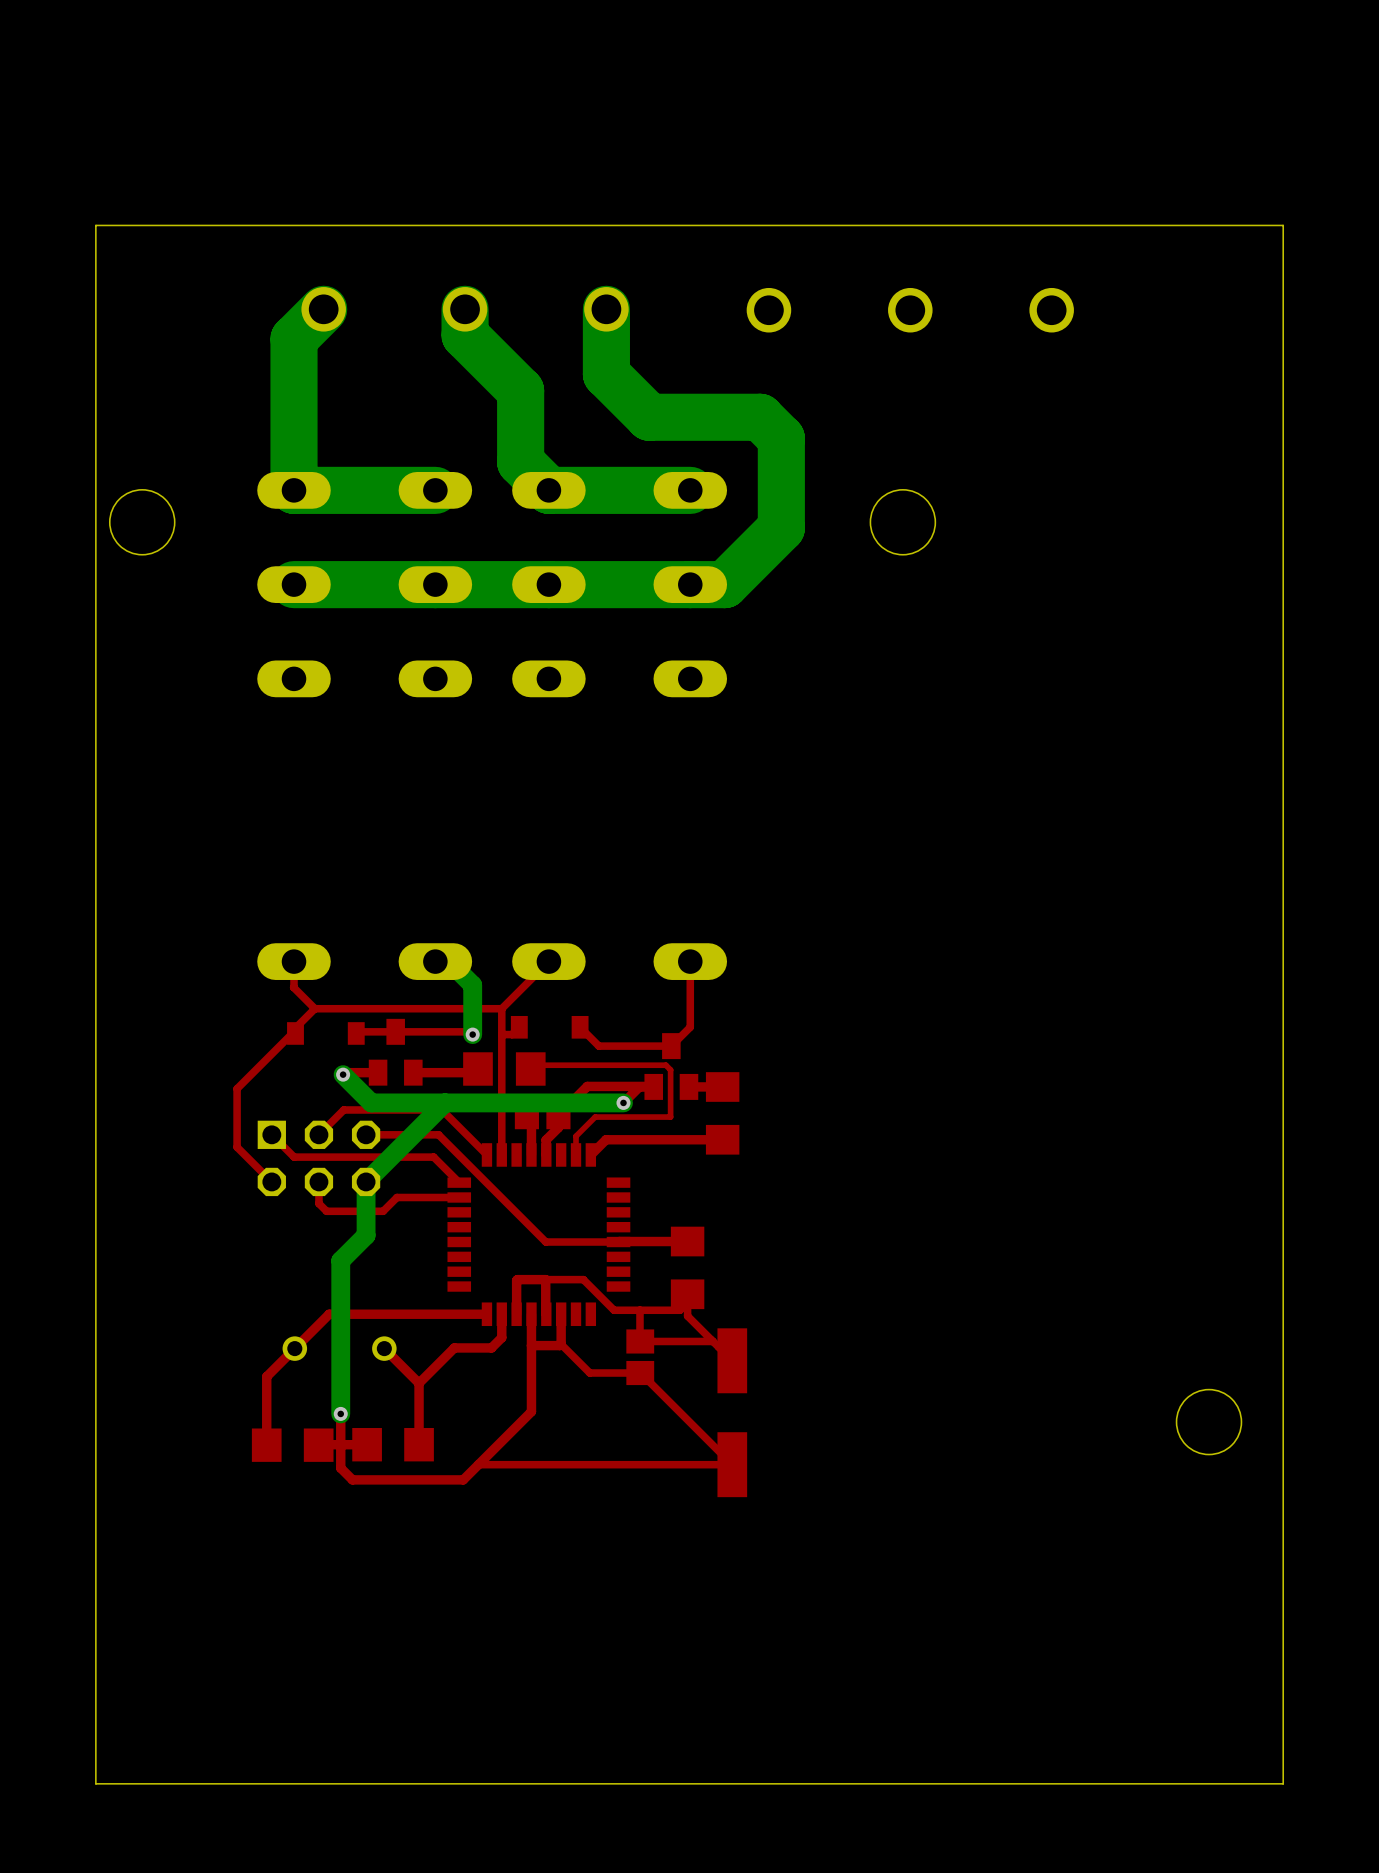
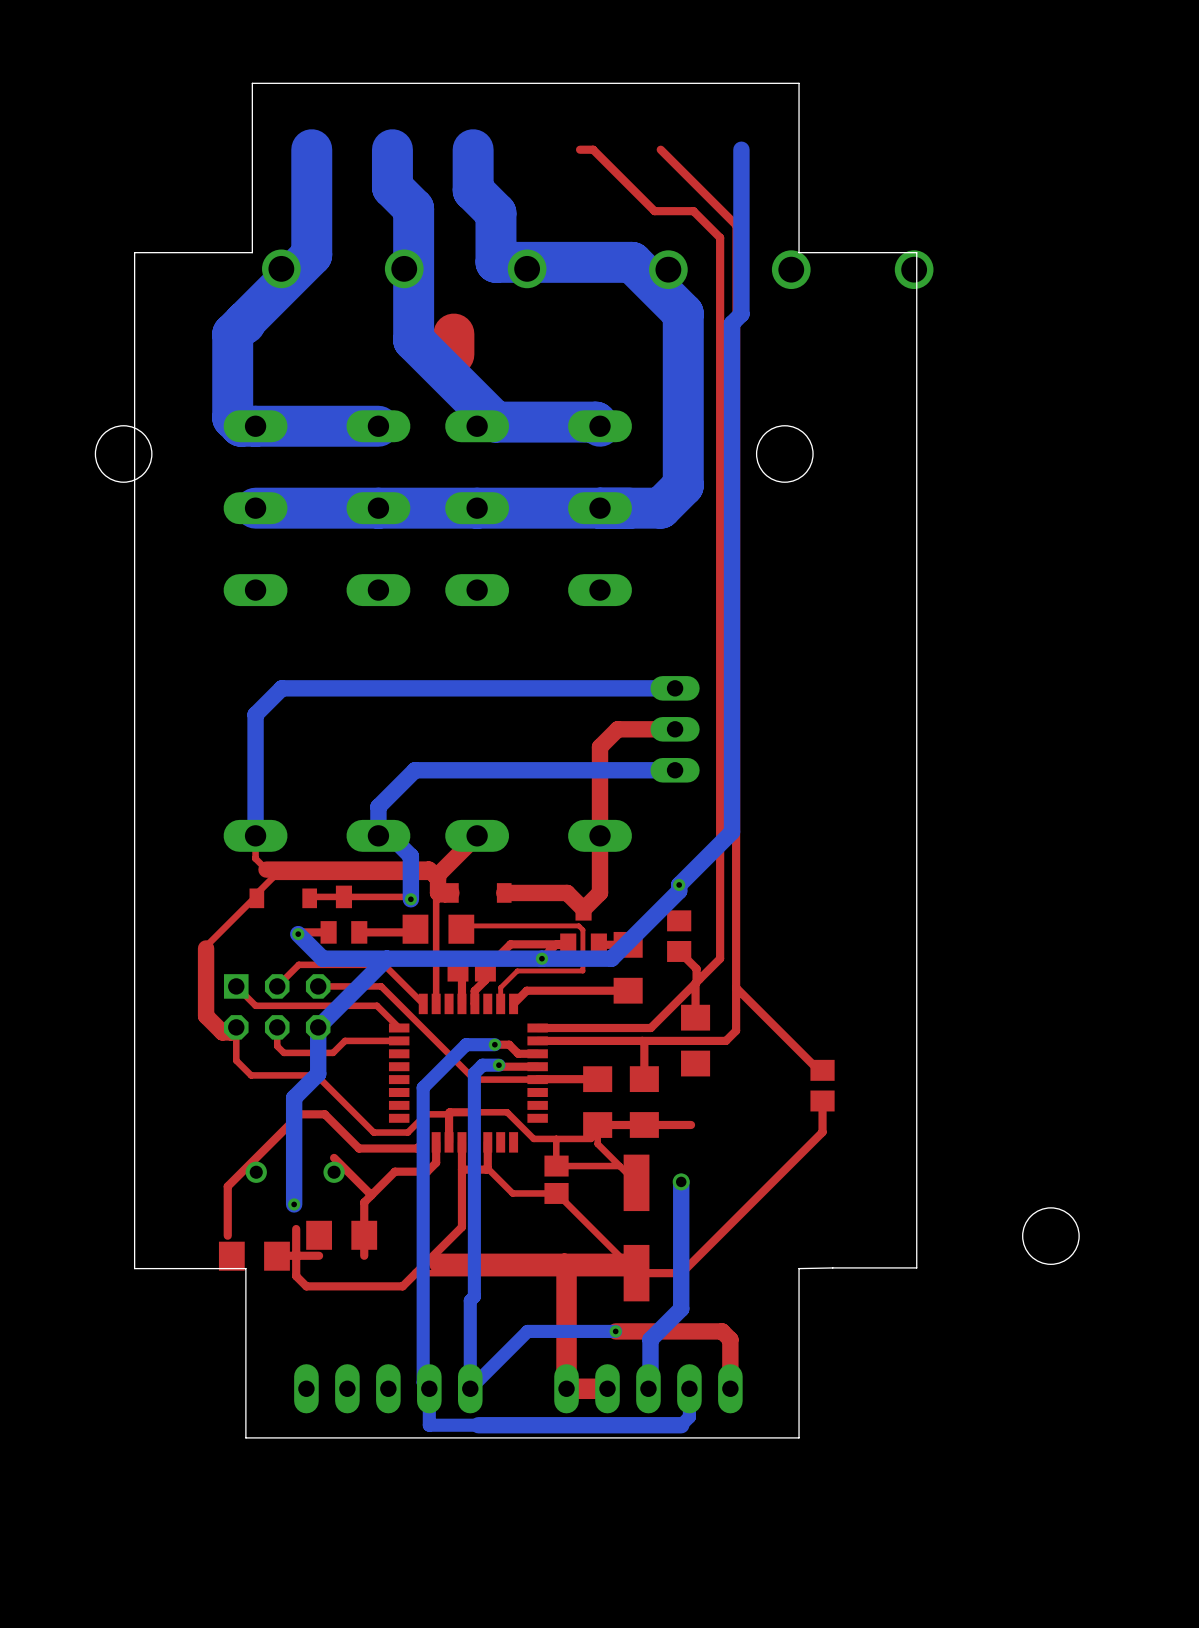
top track: none -> (580, 149) (593, 149) (654, 211) (693, 211) (720, 237) (720, 958) (650, 1028) (537, 1028)
top track: none -> (660, 149) (736, 225) (736, 1030) (725, 1040) (537, 1040)
bottom track: none -> (741, 149) (741, 314) (732, 323) (732, 832) (679, 884) (679, 891) (611, 958) (541, 958)
board edge: (1283, 225) (95, 225) (95, 1783) (1283, 1783) (1283, 225) -> (799, 83) (799, 252) (916, 252) (916, 1267) (799, 1268) (799, 1437) (245, 1437) (245, 1268) (134, 1268) (134, 252) (252, 252) (252, 83) (799, 83)
bottom track: (323, 309) (294, 338) (294, 490) -> (311, 149) (311, 254) (232, 334) (232, 418) (240, 426) (255, 426)
bottom track: (465, 309) (465, 335) (520, 390) (520, 462) (548, 490) (690, 490) -> (392, 149) (392, 187) (413, 208) (413, 340) (495, 422) (595, 422) (600, 426)
bottom track: (606, 309) (606, 374) (649, 417) (760, 417) (781, 438) (781, 528) (724, 584) -> (473, 149) (473, 190) (495, 213) (495, 262) (632, 262) (683, 313) (683, 485) (660, 508) (629, 508)
top track: none -> (445, 342) (453, 334) (453, 354)
bottom track: none -> (675, 688) (281, 688) (255, 714) (255, 835)
top track: none -> (675, 729) (617, 729) (600, 747) (600, 835)
part: none -> (675, 729)
bottom track: none -> (675, 770) (414, 770) (378, 806) (378, 835)
top track width: thin (548, 961) (501, 1008) -> thick (477, 835) (436, 876)
top track width: thin (690, 961) (690, 1027) (671, 1046) -> thick (600, 835) (600, 892) (583, 909)
top track: none -> (266, 869) (428, 869) (438, 878) (438, 892) (451, 892)
via: none -> (679, 884)
top track: (580, 1027) (598, 1046) (671, 1046) -> (504, 892) (567, 892) (583, 909)
part: none -> (679, 936)
top track width: thin (237, 1091) (237, 1147) -> thick (206, 948) (206, 997)
top track: none -> (679, 951) (696, 968) (696, 982)
top track: none -> (695, 983) (695, 1017)
top track: none -> (736, 987) (818, 1070) (822, 1070)
top track: (237, 1147) (271, 1181) -> (206, 997) (206, 1016) (222, 1032) (231, 1032) (236, 1027) (236, 1060) (251, 1075) (316, 1075) (373, 1132) (407, 1132) (426, 1114) (449, 1113)
top track: none -> (642, 1040) (644, 1042) (644, 1079)
part: none -> (695, 1040)
top track: none -> (494, 1044) (509, 1044) (518, 1053) (537, 1053)
bottom track: none -> (494, 1044) (466, 1044) (423, 1087) (423, 1382) (429, 1388) (429, 1425) (681, 1425) (689, 1417) (689, 1388)
via: none -> (494, 1044)
top track: none -> (498, 1065) (537, 1066)
bottom track: none -> (498, 1065) (482, 1065) (474, 1073) (474, 1296) (470, 1300) (470, 1388) (527, 1331) (615, 1331)
via: none -> (498, 1065)
part: none -> (822, 1085)
bottom track: (340, 1260) (340, 1413) -> (296, 1095) (294, 1097) (294, 1204)
top track: none -> (822, 1100) (822, 1132) (681, 1273) (636, 1273) (627, 1263) (439, 1263)
part: none -> (644, 1102)
top track: none -> (691, 1124) (597, 1125)
top track: (486, 1314) (329, 1314) (266, 1376) (266, 1445) -> (423, 1142) (417, 1148) (359, 1148) (324, 1114) (299, 1114) (227, 1186) (227, 1235)
top track: none -> (334, 1157) (371, 1195)
top track: (384, 1348) (419, 1383) -> none
bottom track: none -> (681, 1181) (681, 1308) (650, 1339) (650, 1386) (648, 1388)
via: none -> (681, 1181)
via position: (340, 1413) -> (294, 1204)
part position: (393, 1444) -> (341, 1235)
top track: none -> (564, 1263) (566, 1265) (566, 1388) (607, 1388)
top track: none -> (615, 1331) (722, 1331) (730, 1339) (730, 1388)
via: none -> (615, 1331)
part: none -> (388, 1388)
part: none -> (648, 1388)

